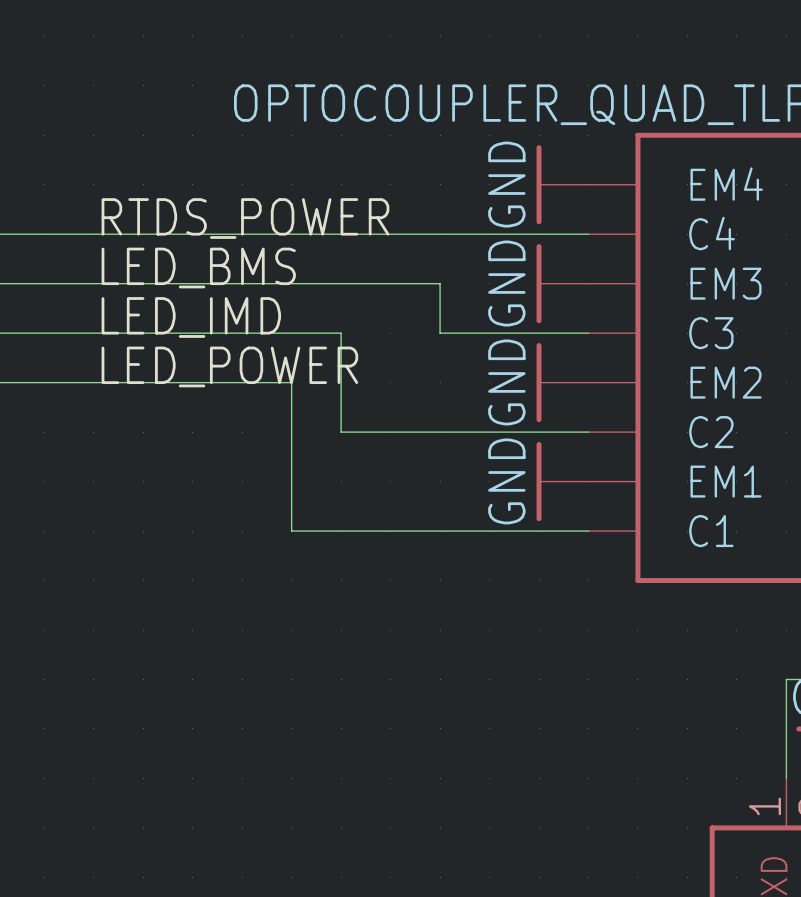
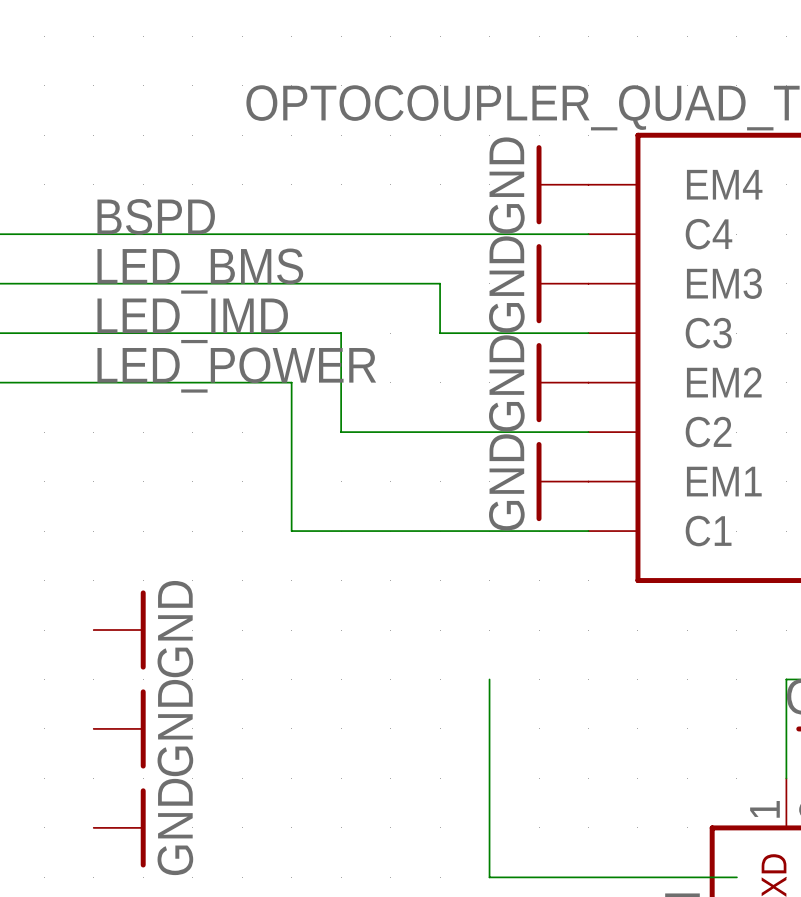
label: RTDS_POWER (245, 218) -> BSPD (156, 216)
power symbol: none -> GND (119, 630)
wire: none -> (489, 679) (489, 877) (736, 877)
power symbol: none -> GND (119, 728)
power symbol: none -> GND (119, 827)

